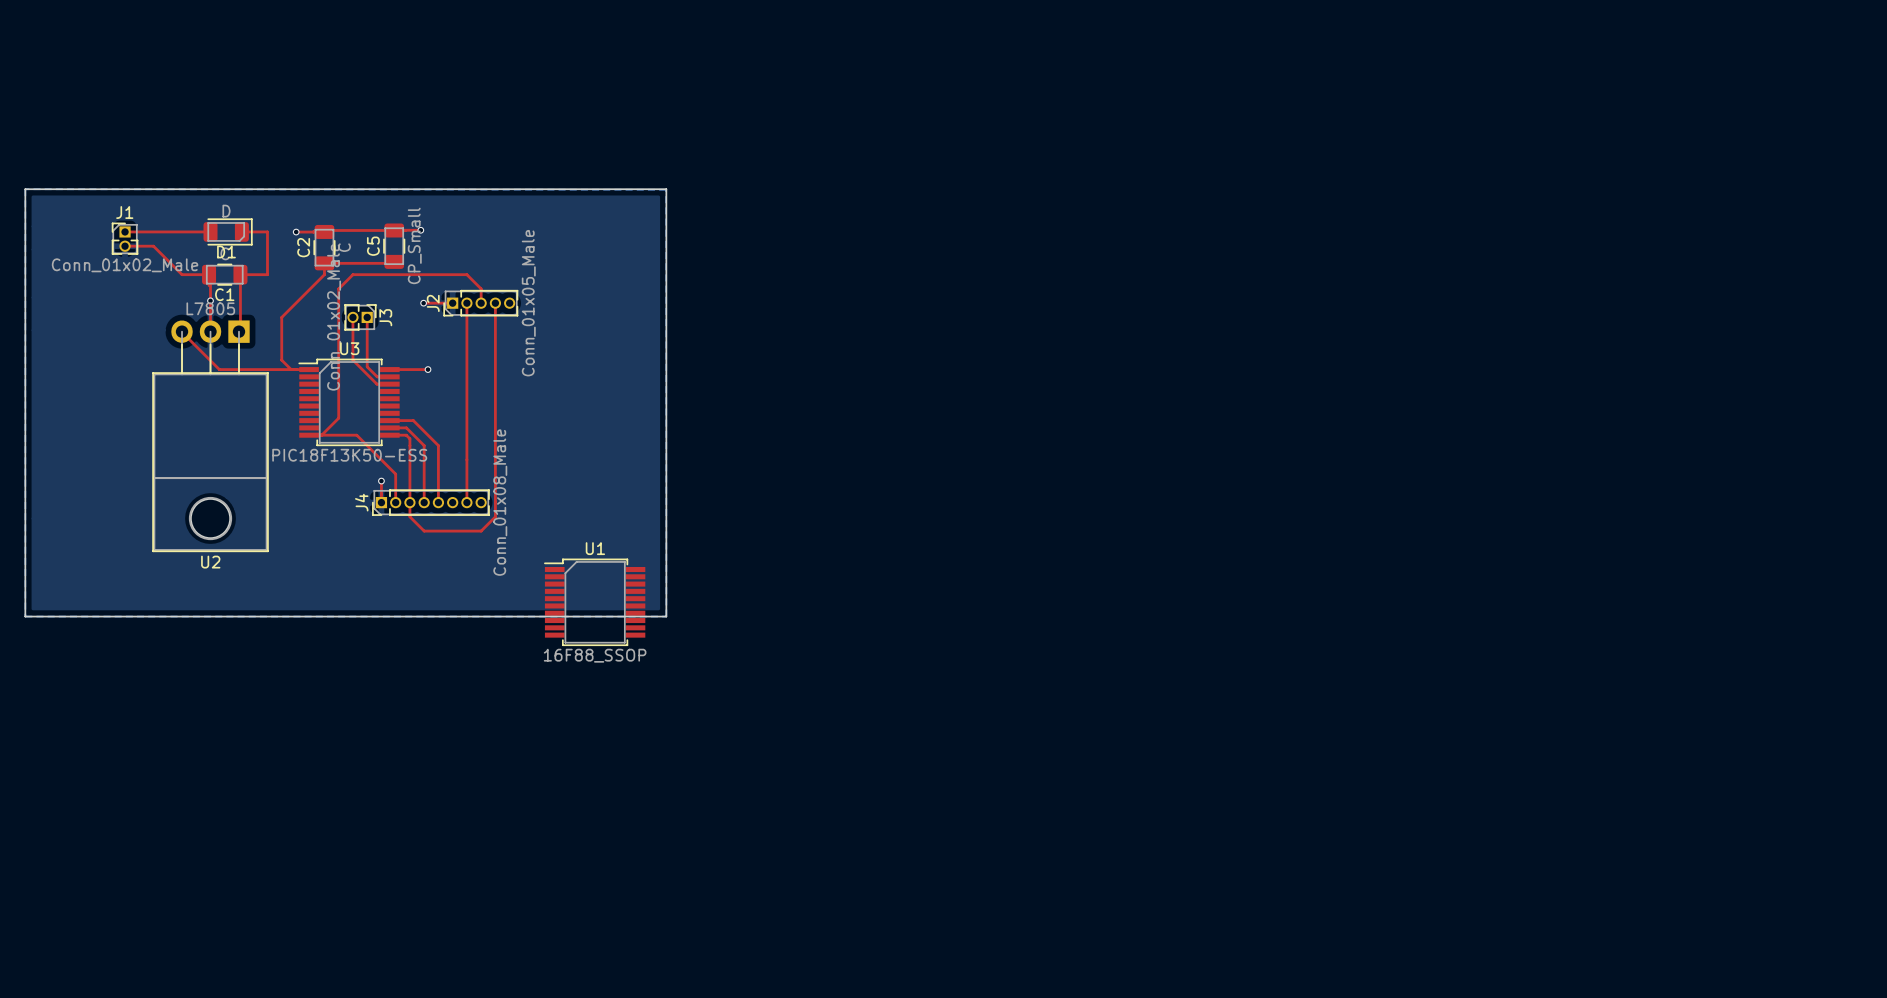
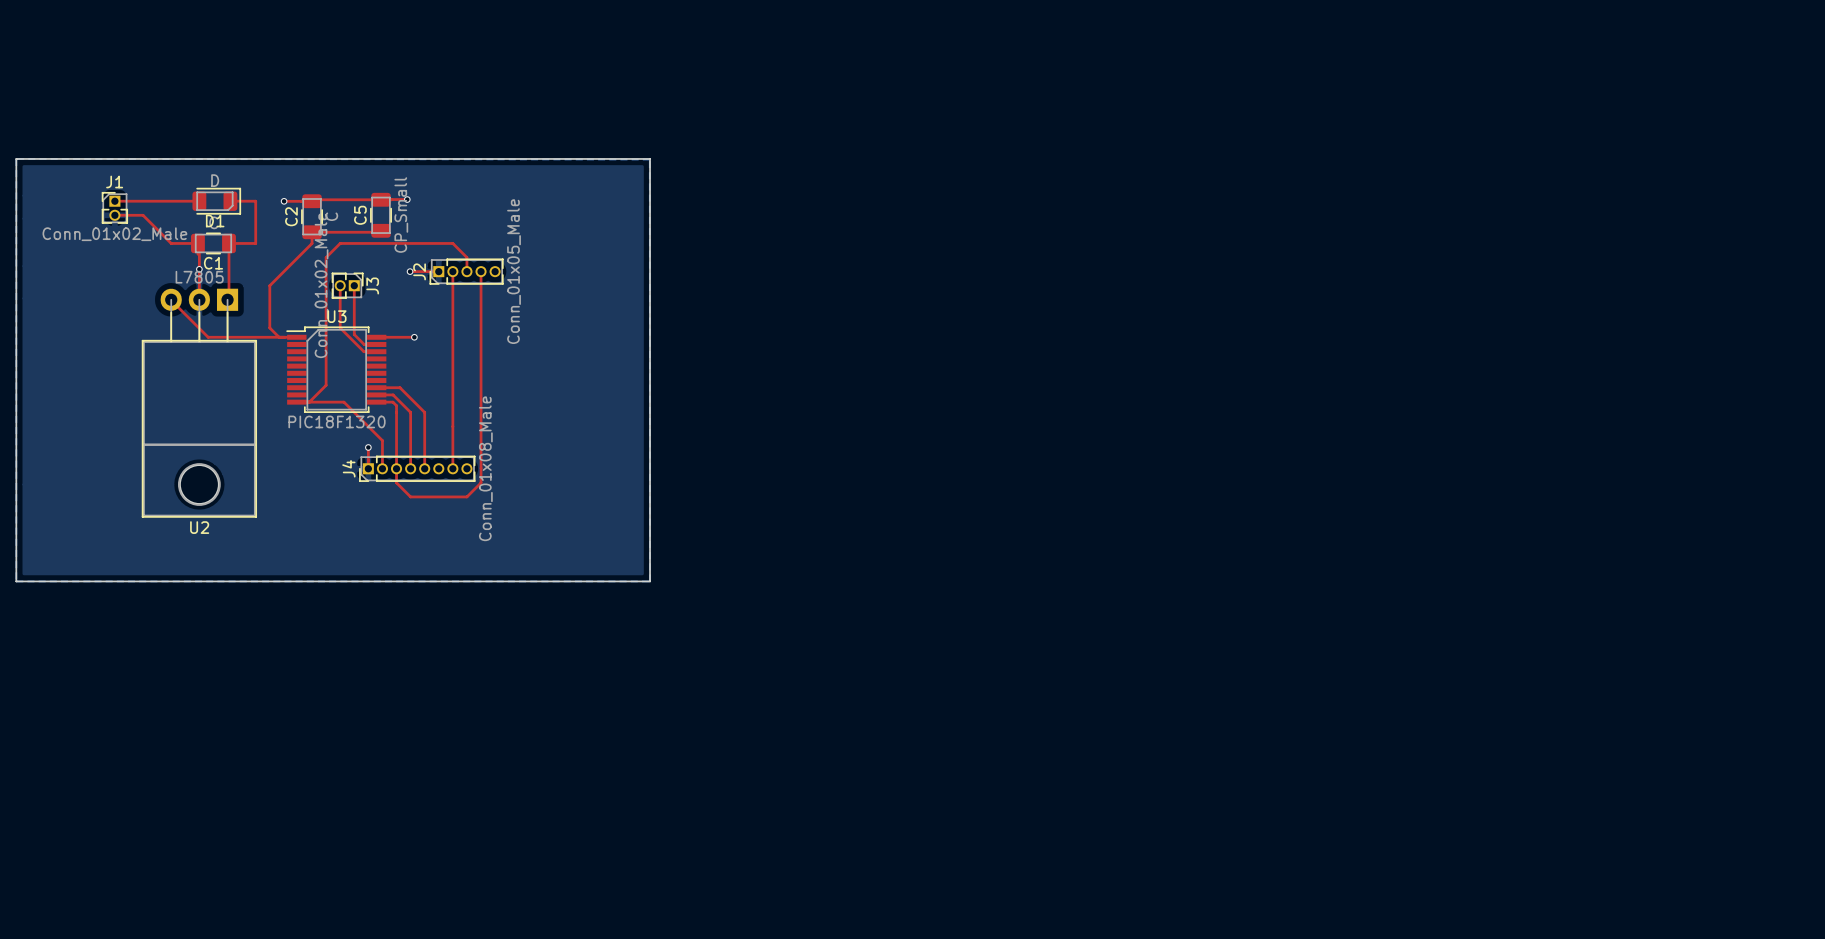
U3 value: PIC18F13K50-ESS (349, 455) -> PIC18F1320 (337, 421)
U1: 16F88_SSOP (594, 602) -> none

